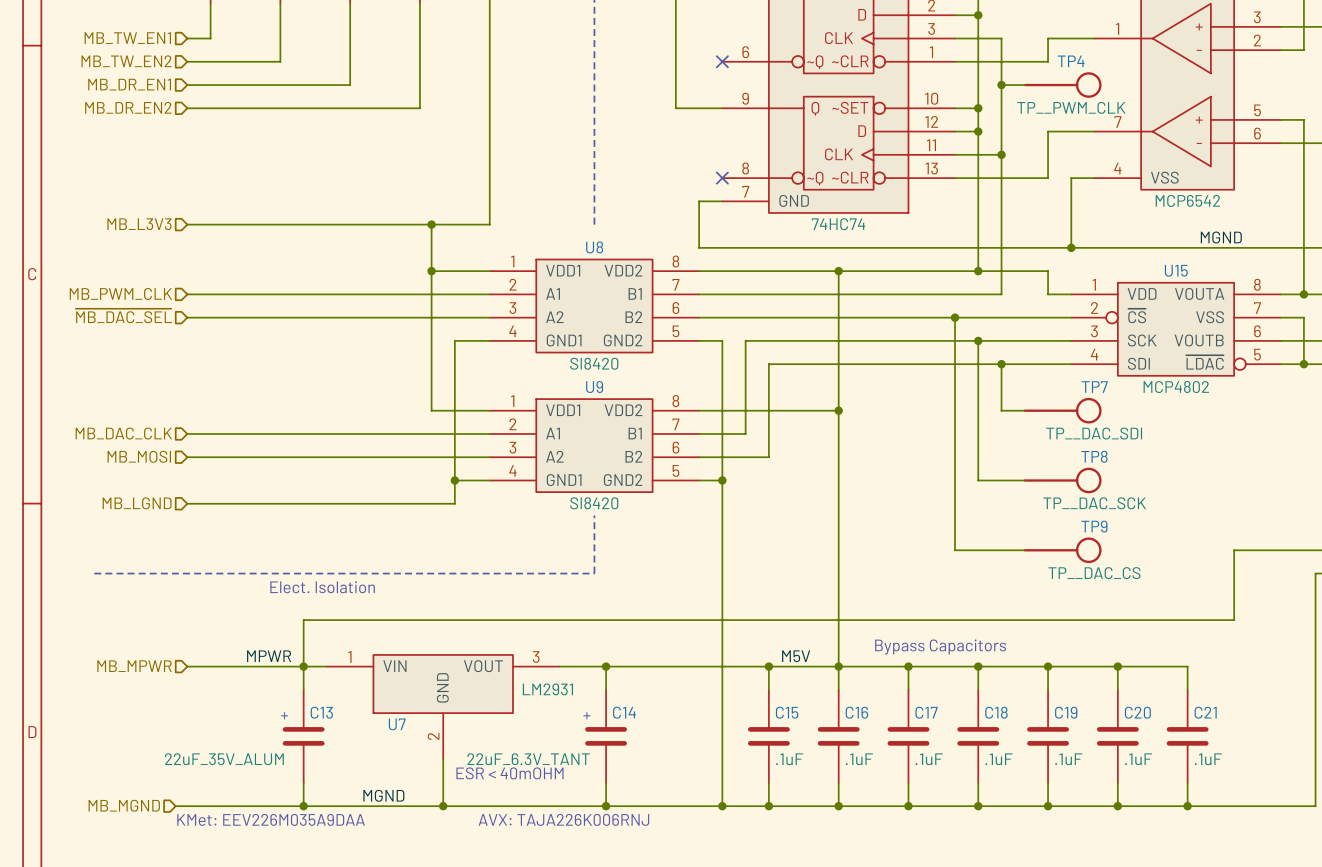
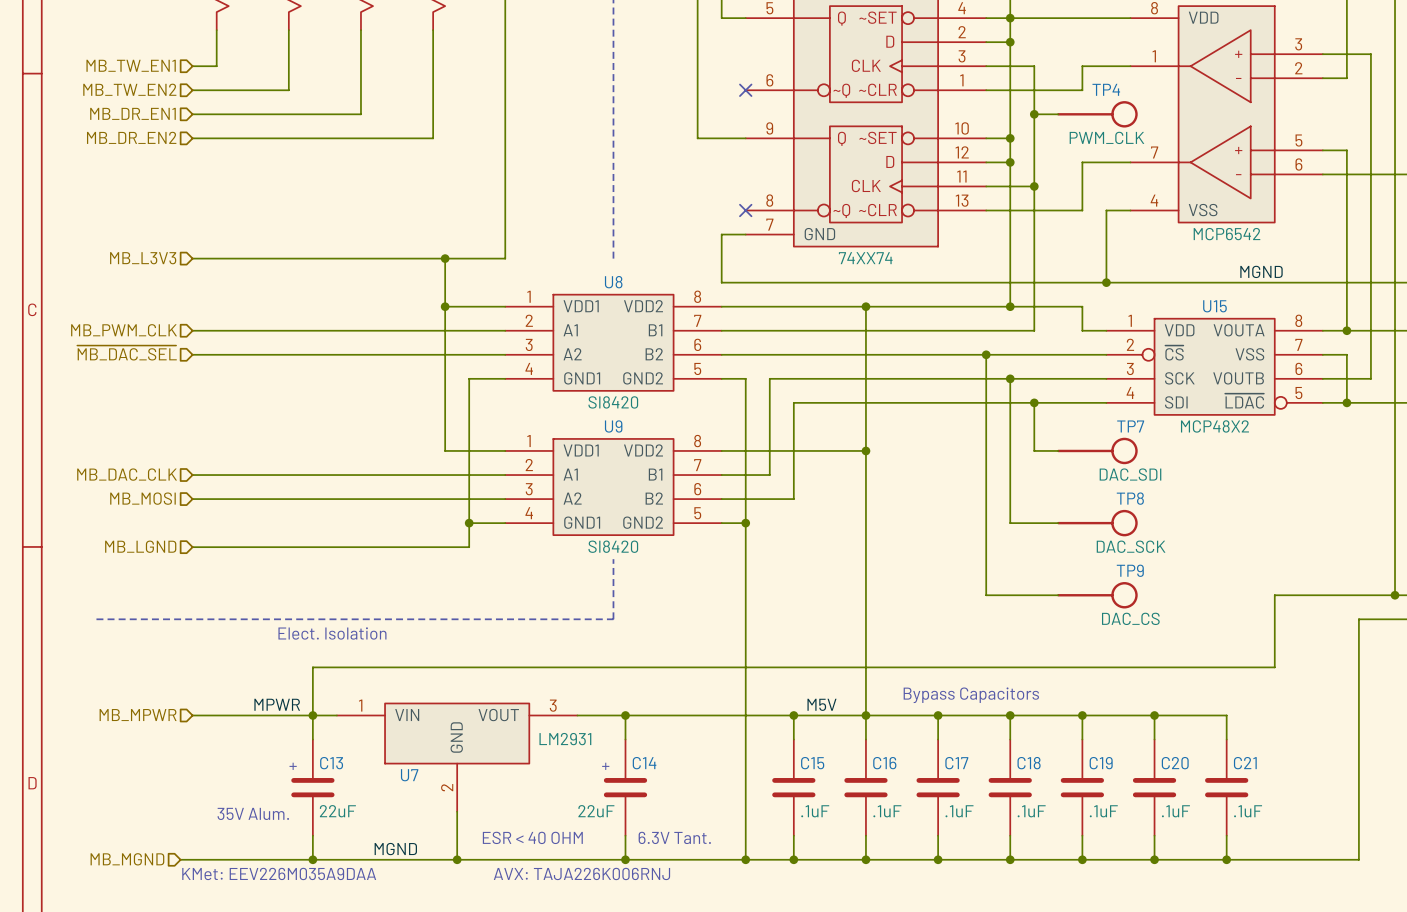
TP4 value: TP__PWM_CLK (1071, 107) -> PWM_CLK (1106, 137)
part value: 74HC74 (838, 224) -> 74XX74 (865, 258)
U15 value: MCP4802 (1176, 387) -> MCP48X2 (1214, 426)
TP7 value: TP__DAC_SDI (1094, 433) -> DAC_SDI (1130, 474)
TP8 value: TP__DAC_SCK (1094, 503) -> DAC_SCK (1131, 546)
TP9 value: TP__DAC_CS (1094, 573) -> DAC_CS (1130, 618)
C13 value: 22uF_35V_ALUM (224, 759) -> 22uF (337, 811)
C14 value: 22uF_6.3V_TANT (528, 759) -> 22uF (596, 811)
text: none -> 35V Alum. (253, 813)
text: ESR < 40mOHM (509, 773) -> ESR < 40 OHM (532, 837)
text: none -> 6.3V Tant. (674, 837)

